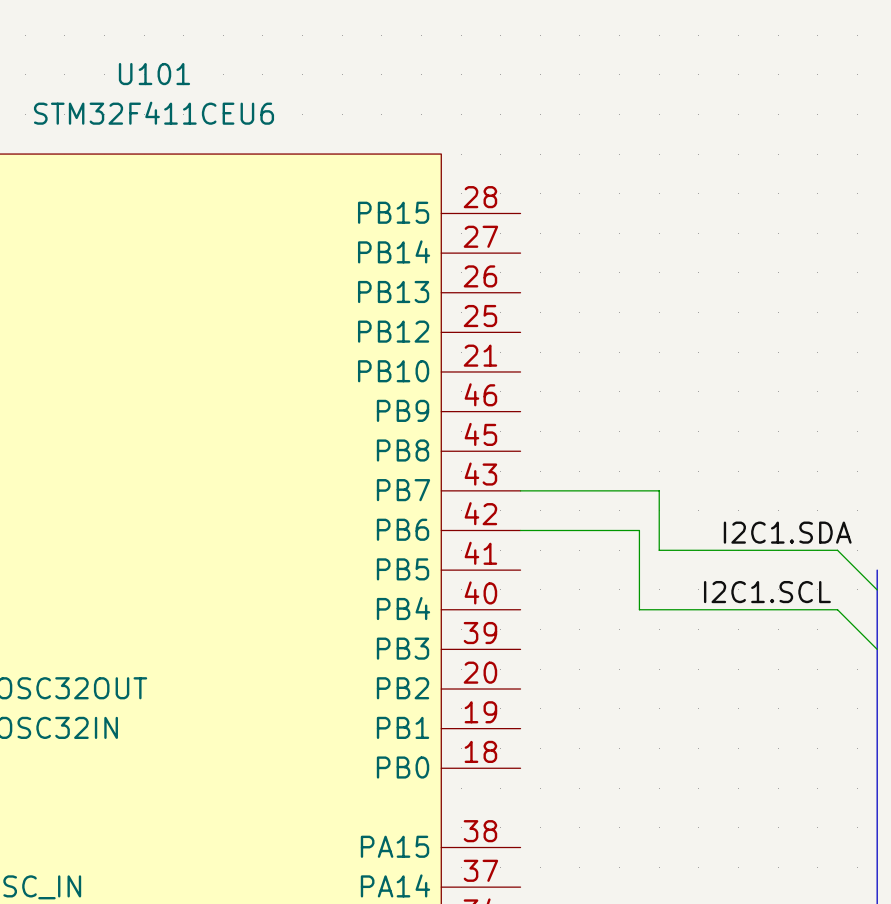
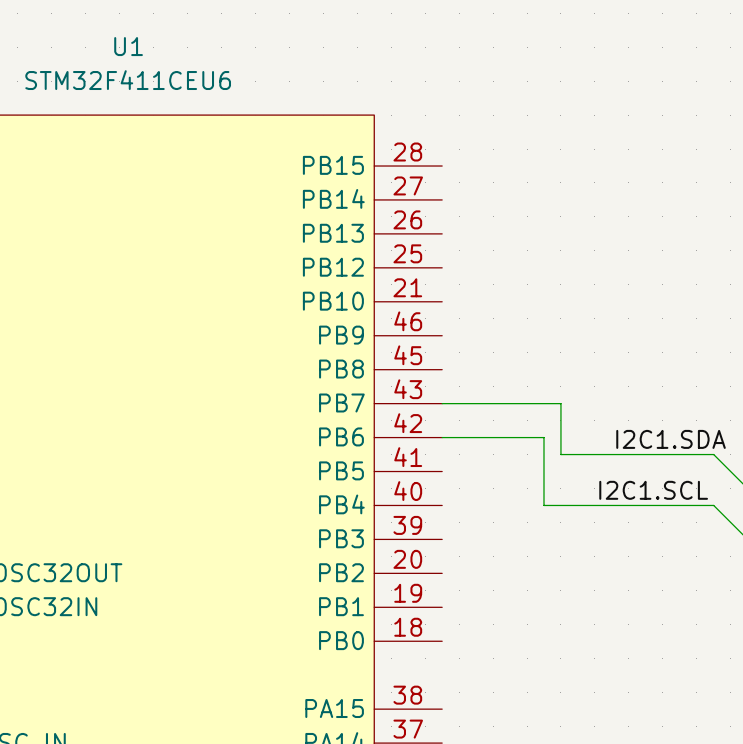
U101 name: U101 (154, 74) -> U1 (128, 46)

